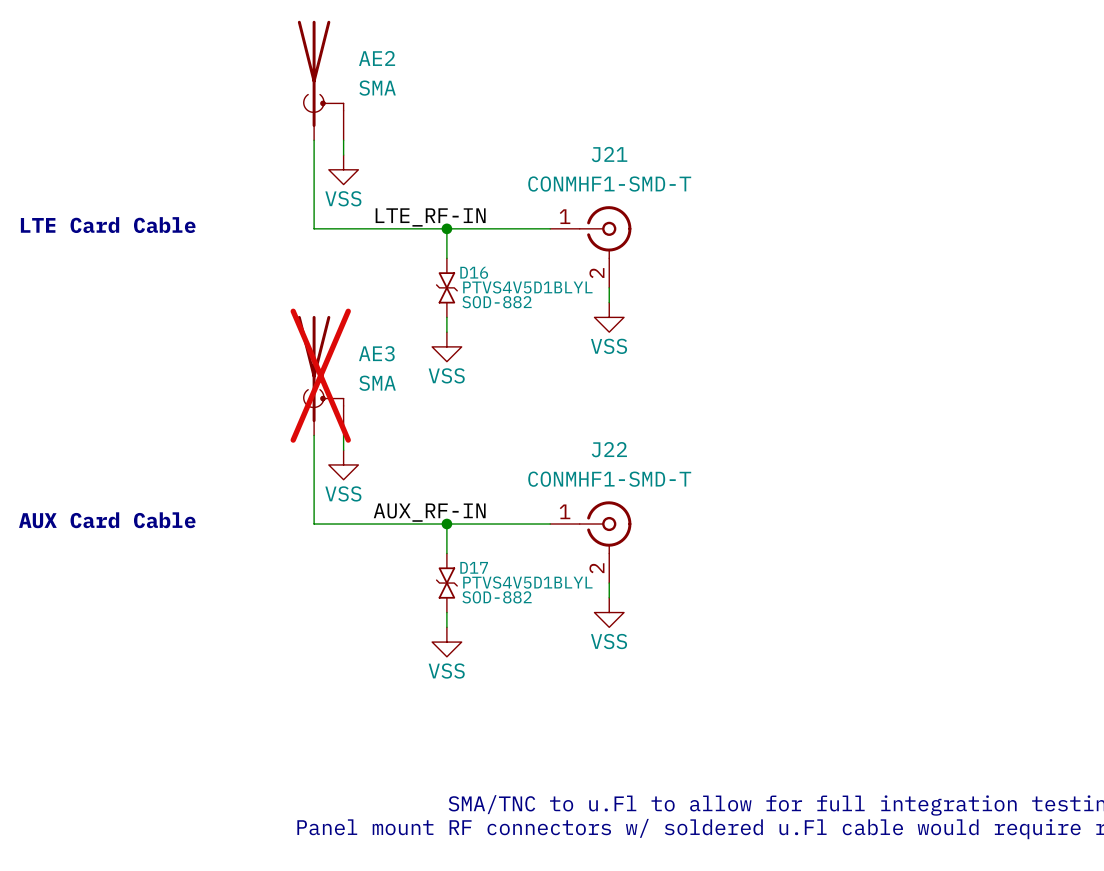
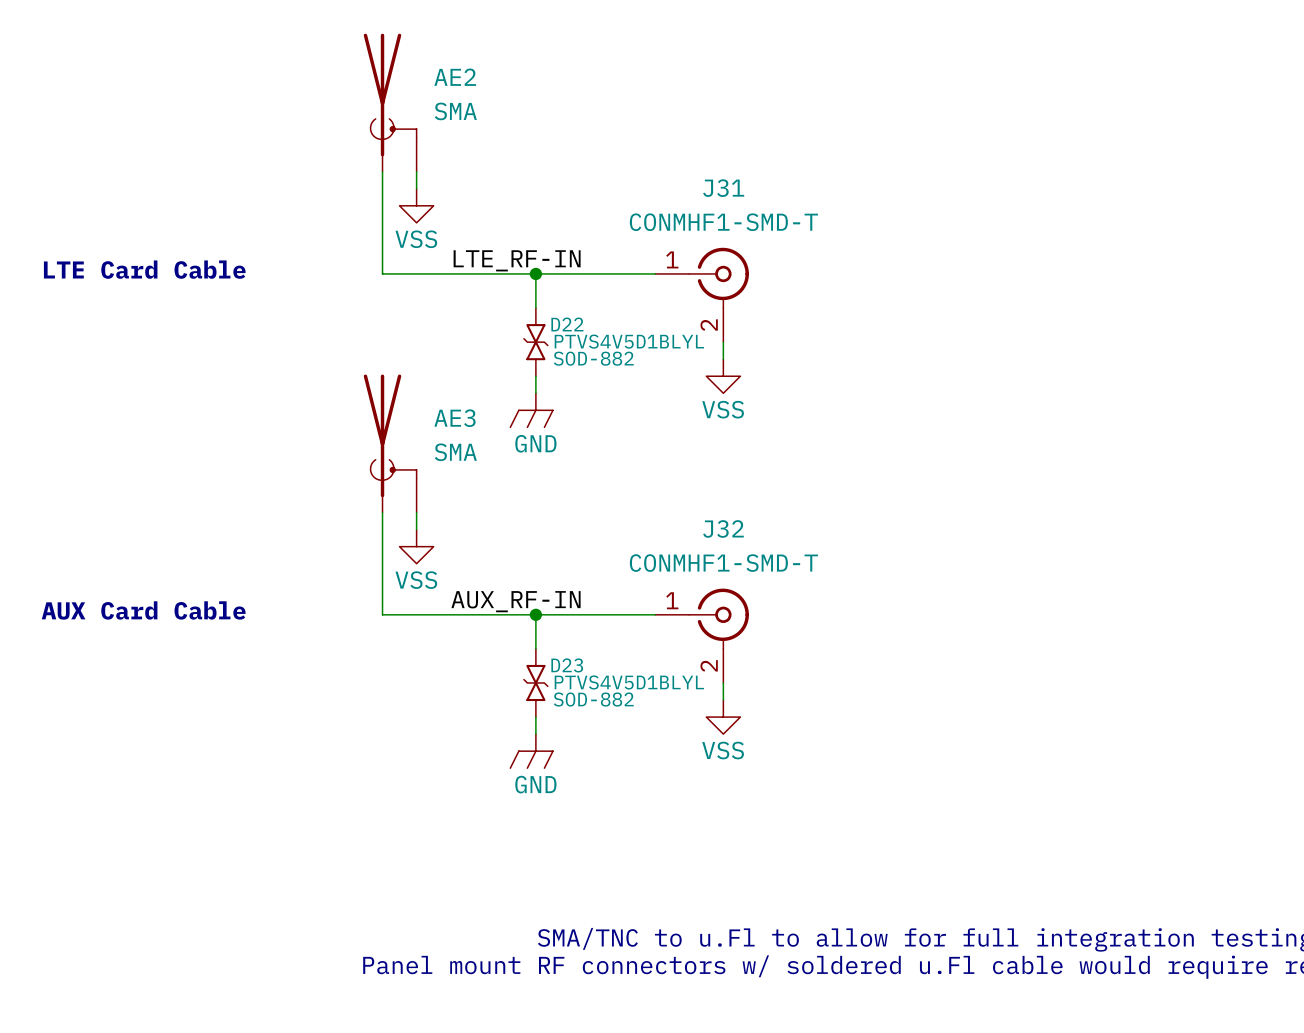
J21 name: J21 (609, 154) -> J31 (723, 188)
D16 name: D16 (474, 272) -> D22 (567, 324)
power symbol: VSS (446, 346) -> GND (531, 410)
AE3 do-not-place cross: (320, 375) -> none
J22 name: J22 (609, 449) -> J32 (723, 528)
D17 name: D17 (474, 567) -> D23 (567, 665)
power symbol: VSS (446, 642) -> GND (531, 751)

